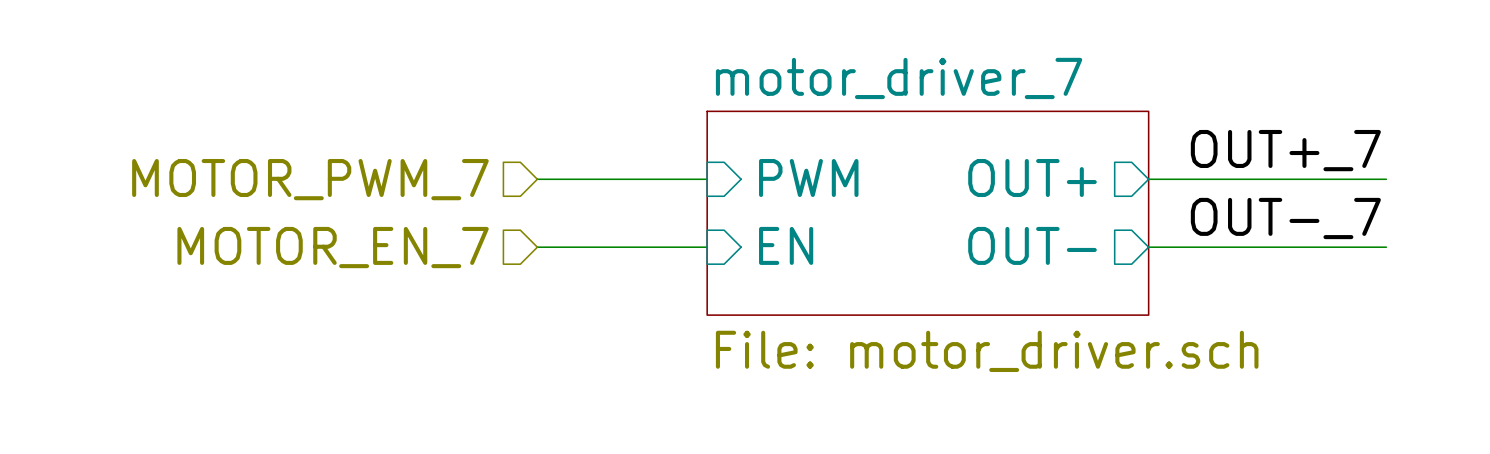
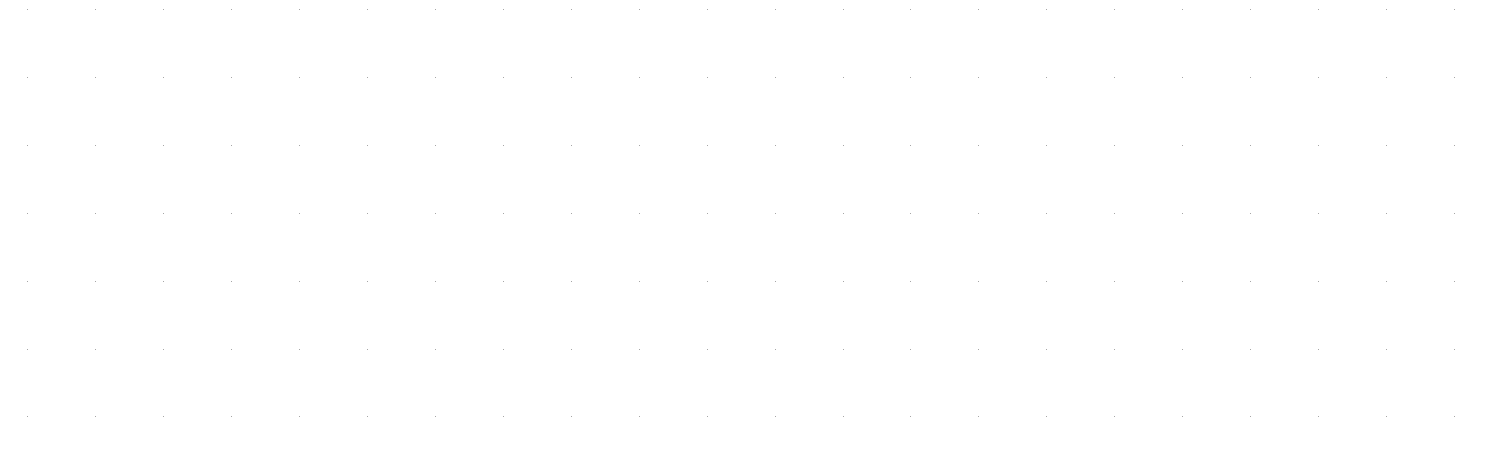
label: OUT+_7 (1285, 150) -> none
sheet pin: PWM (808, 178) -> none
sheet pin: OUT+ (1032, 178) -> none
hierarchical label: MOTOR_PWM_7 (310, 179) -> none
wire: (537, 179) (707, 179) -> none
wire: (1148, 179) (1386, 179) -> none
sheet motor_driver_7: File: motor_driver.sch (927, 213) -> none
label: OUT-_7 (1285, 218) -> none
sheet pin: EN (786, 245) -> none
sheet pin: OUT- (1032, 245) -> none
hierarchical label: MOTOR_EN_7 (333, 247) -> none
wire: (537, 247) (707, 247) -> none
wire: (1148, 247) (1386, 247) -> none

